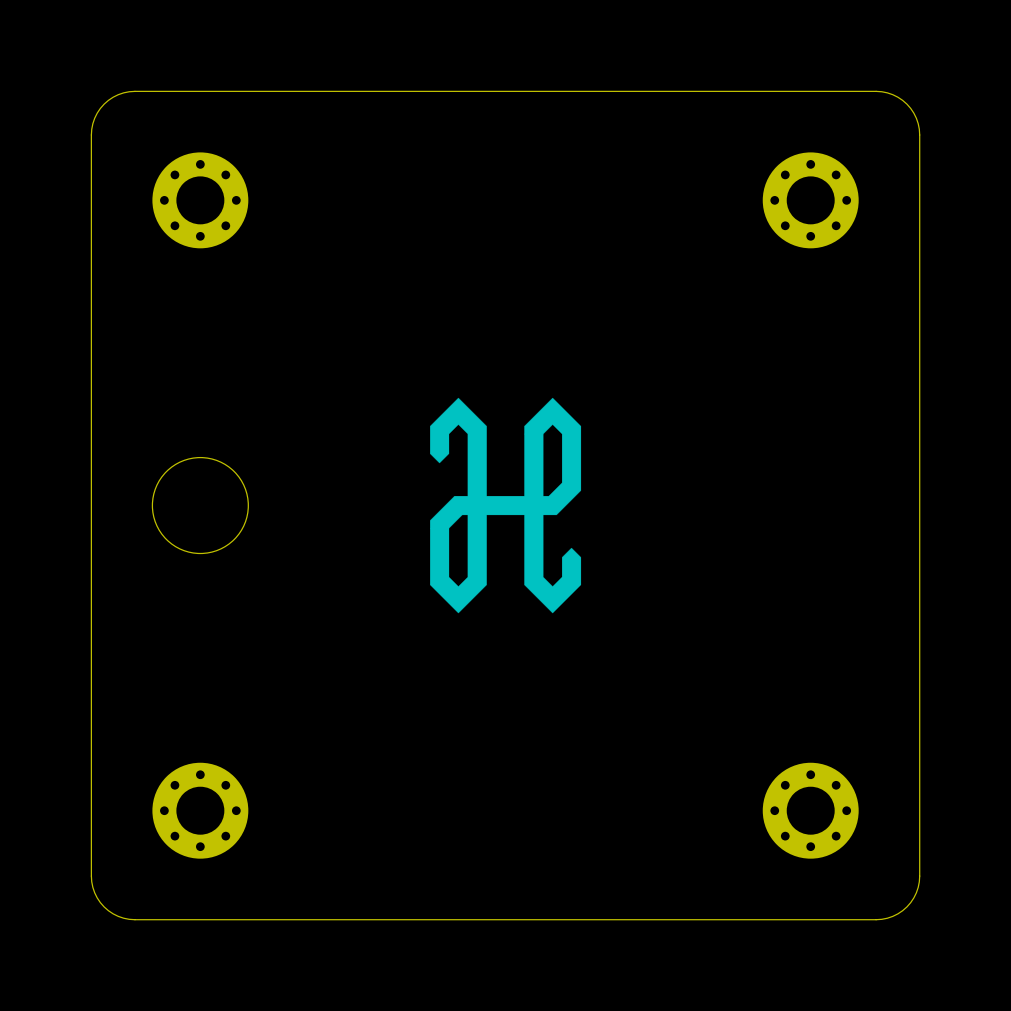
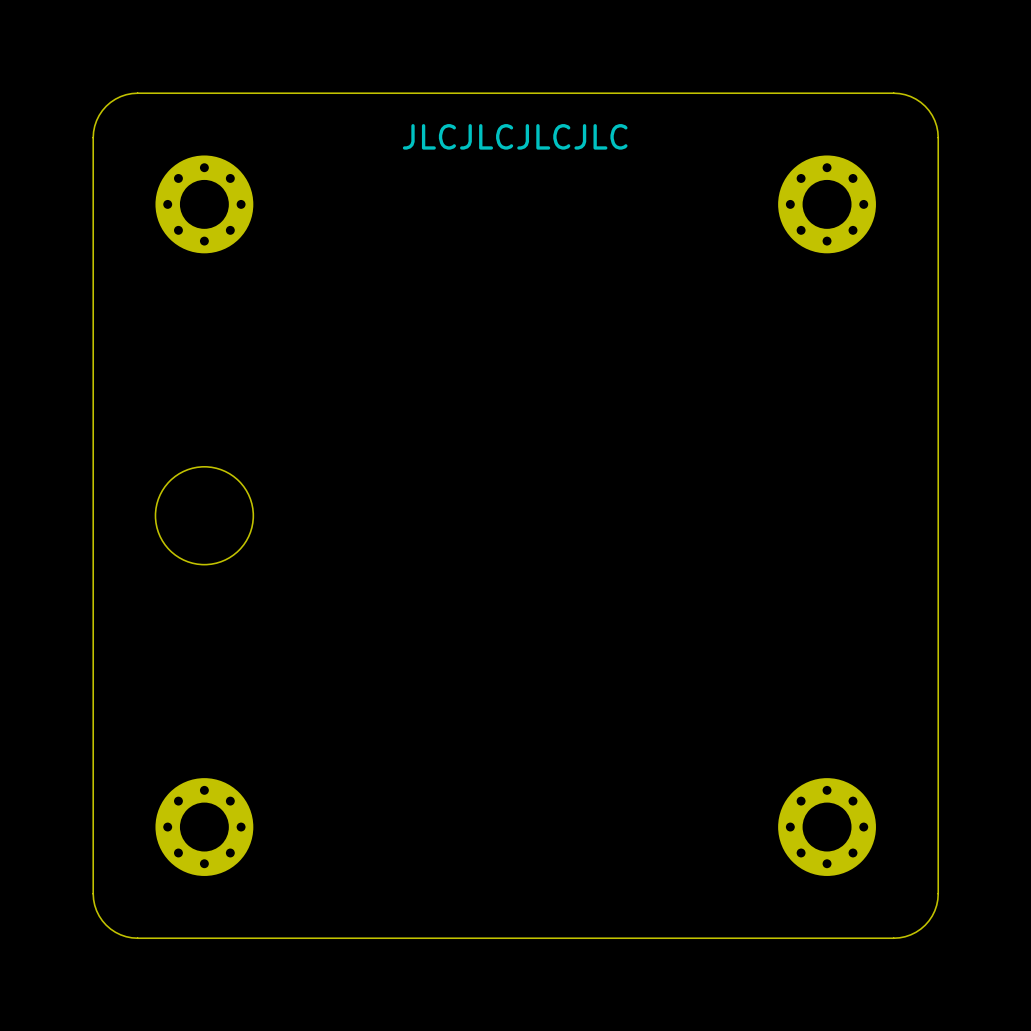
text: none -> JLCJLCJLCJLC (515, 136)
drawing: [430, 397, 582, 614] -> none

